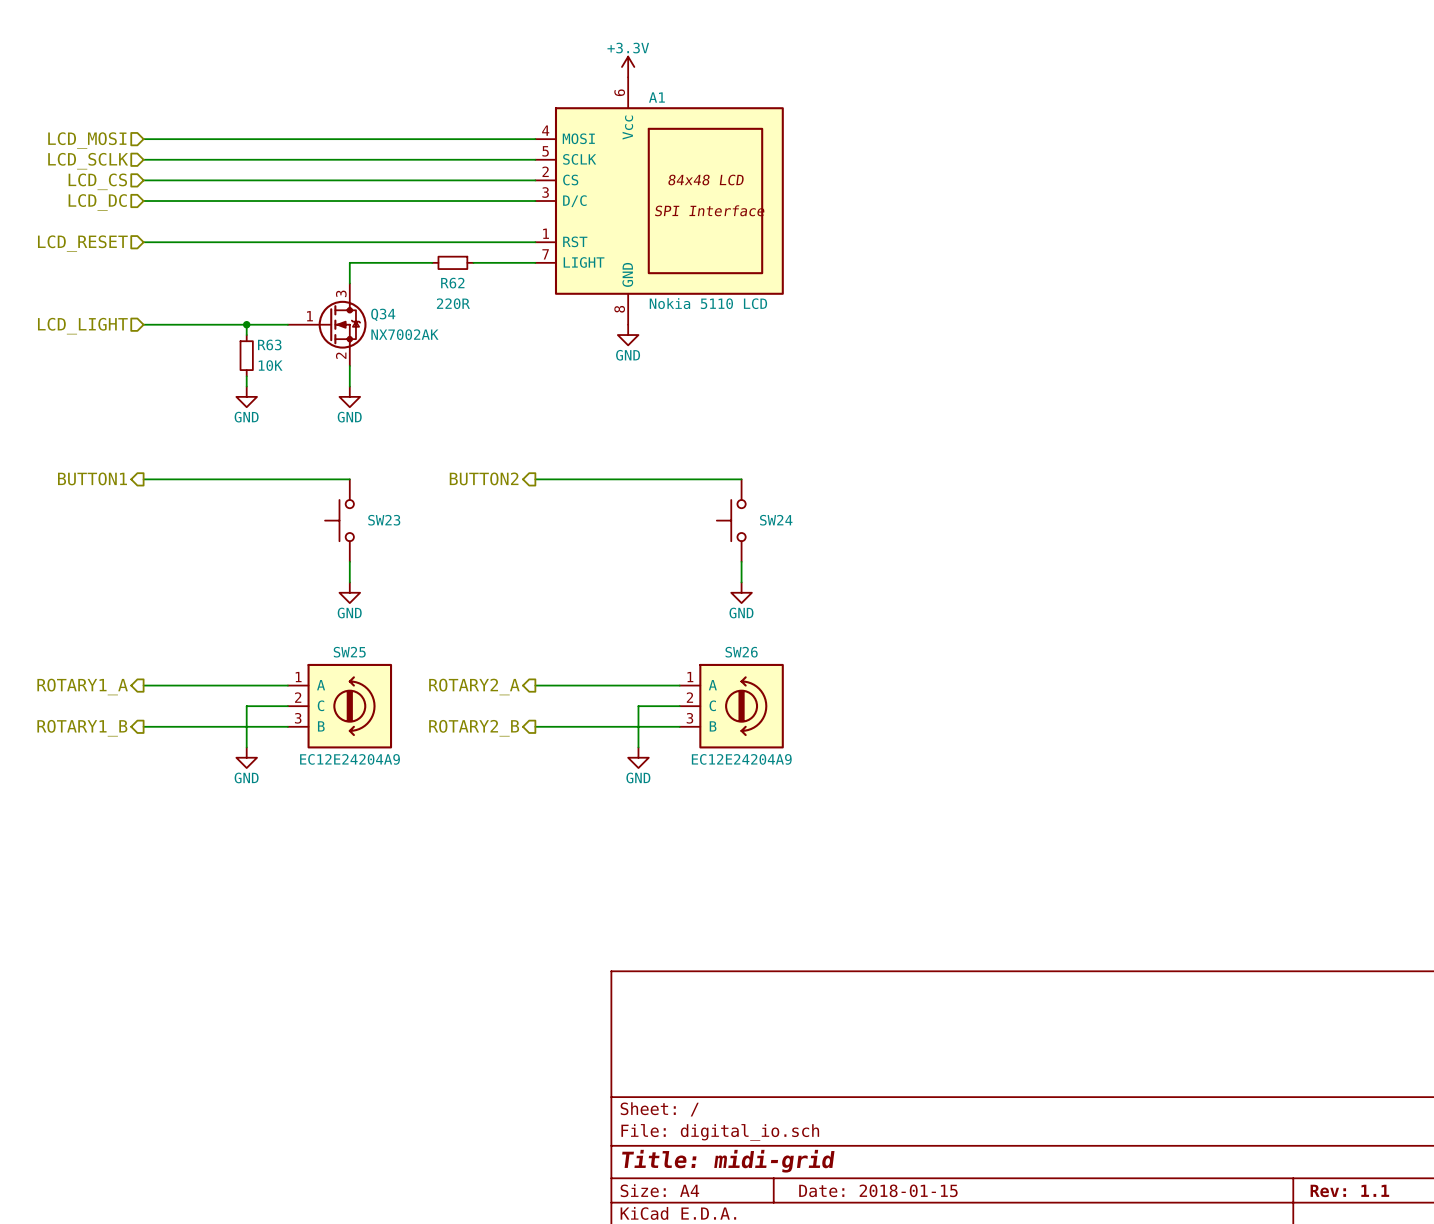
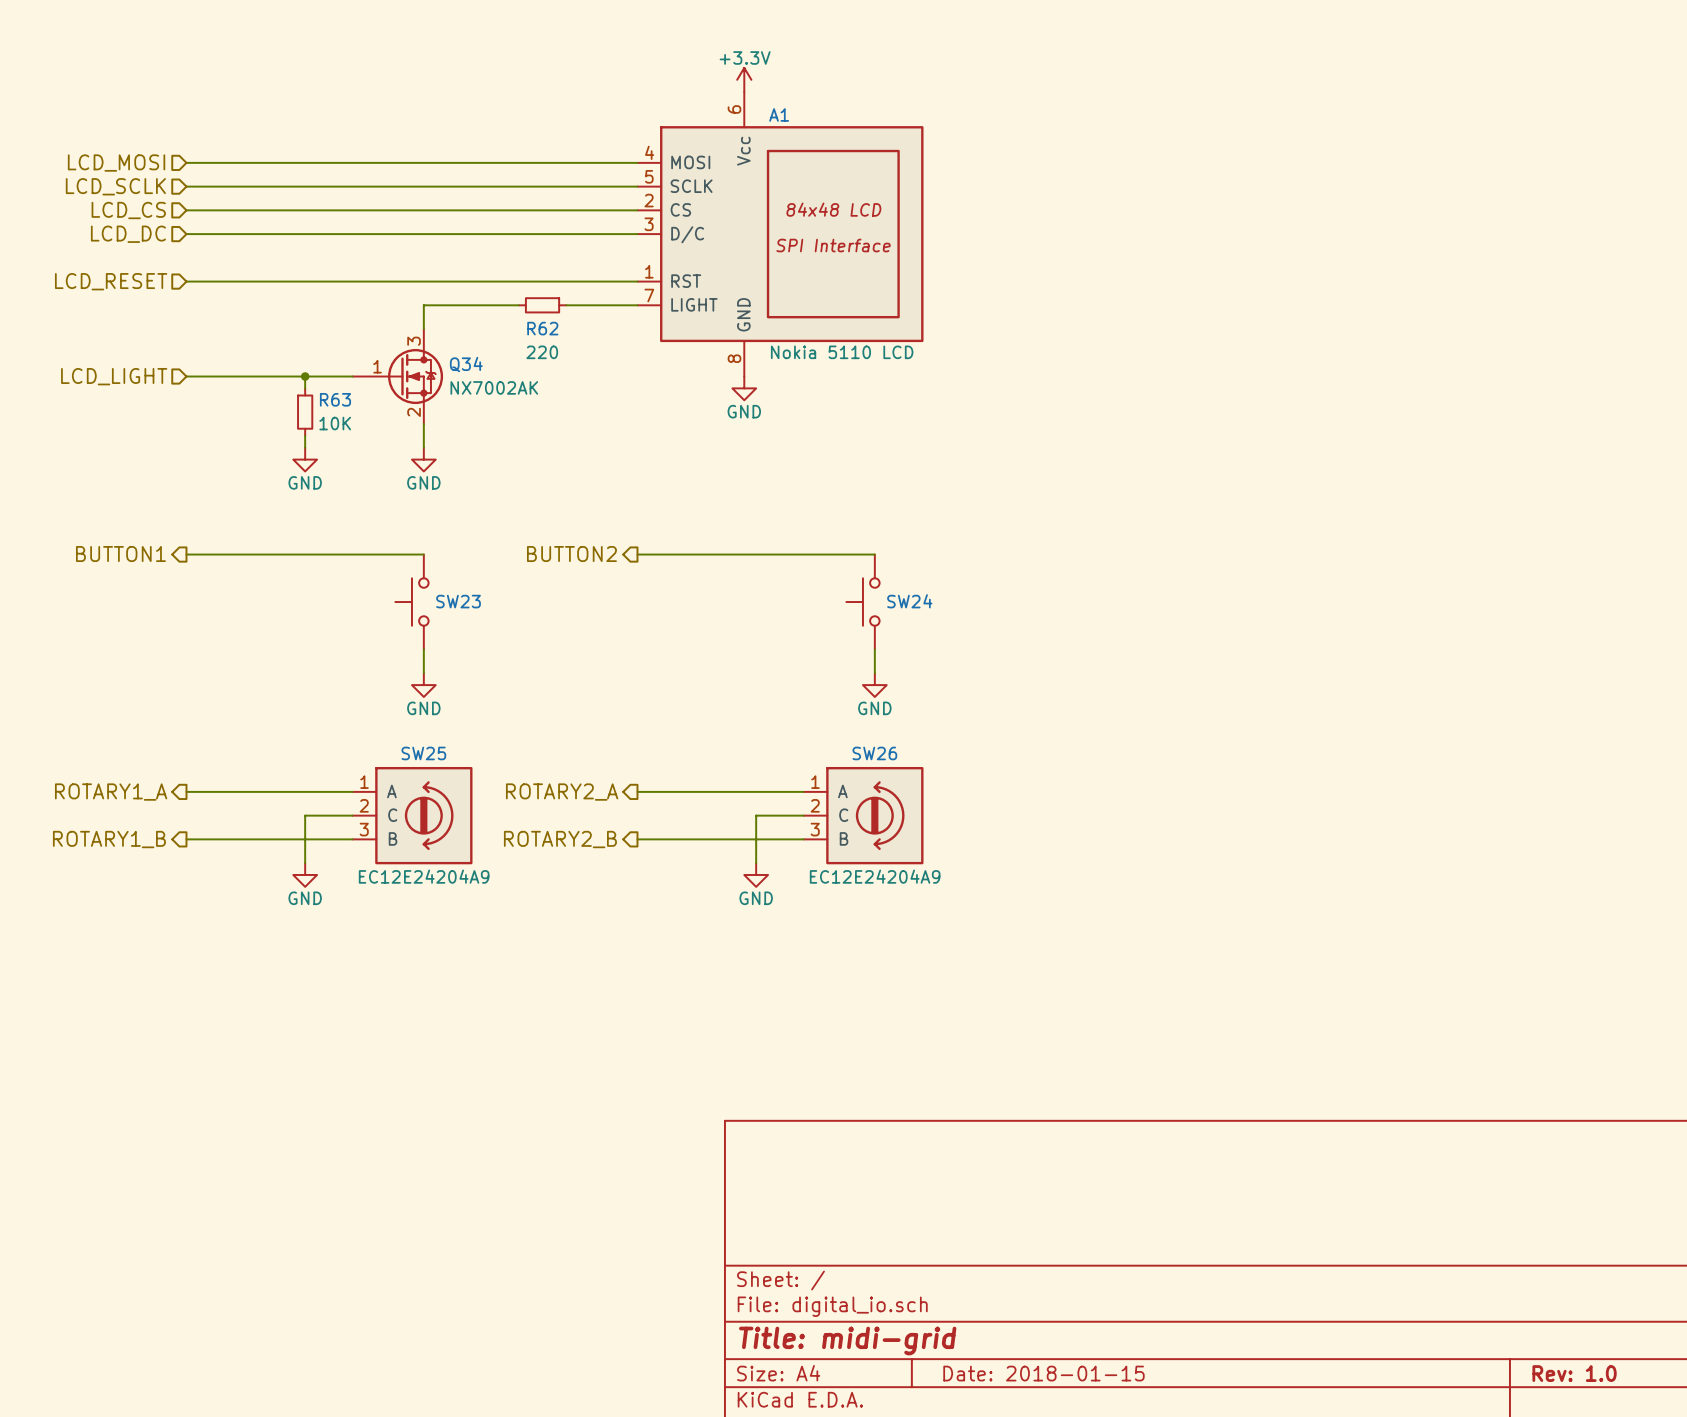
R62 value: 220R (453, 303) -> 220 (542, 352)
title block: Rev: 1.1 (1349, 1190) -> Rev: 1.0 (1574, 1373)

